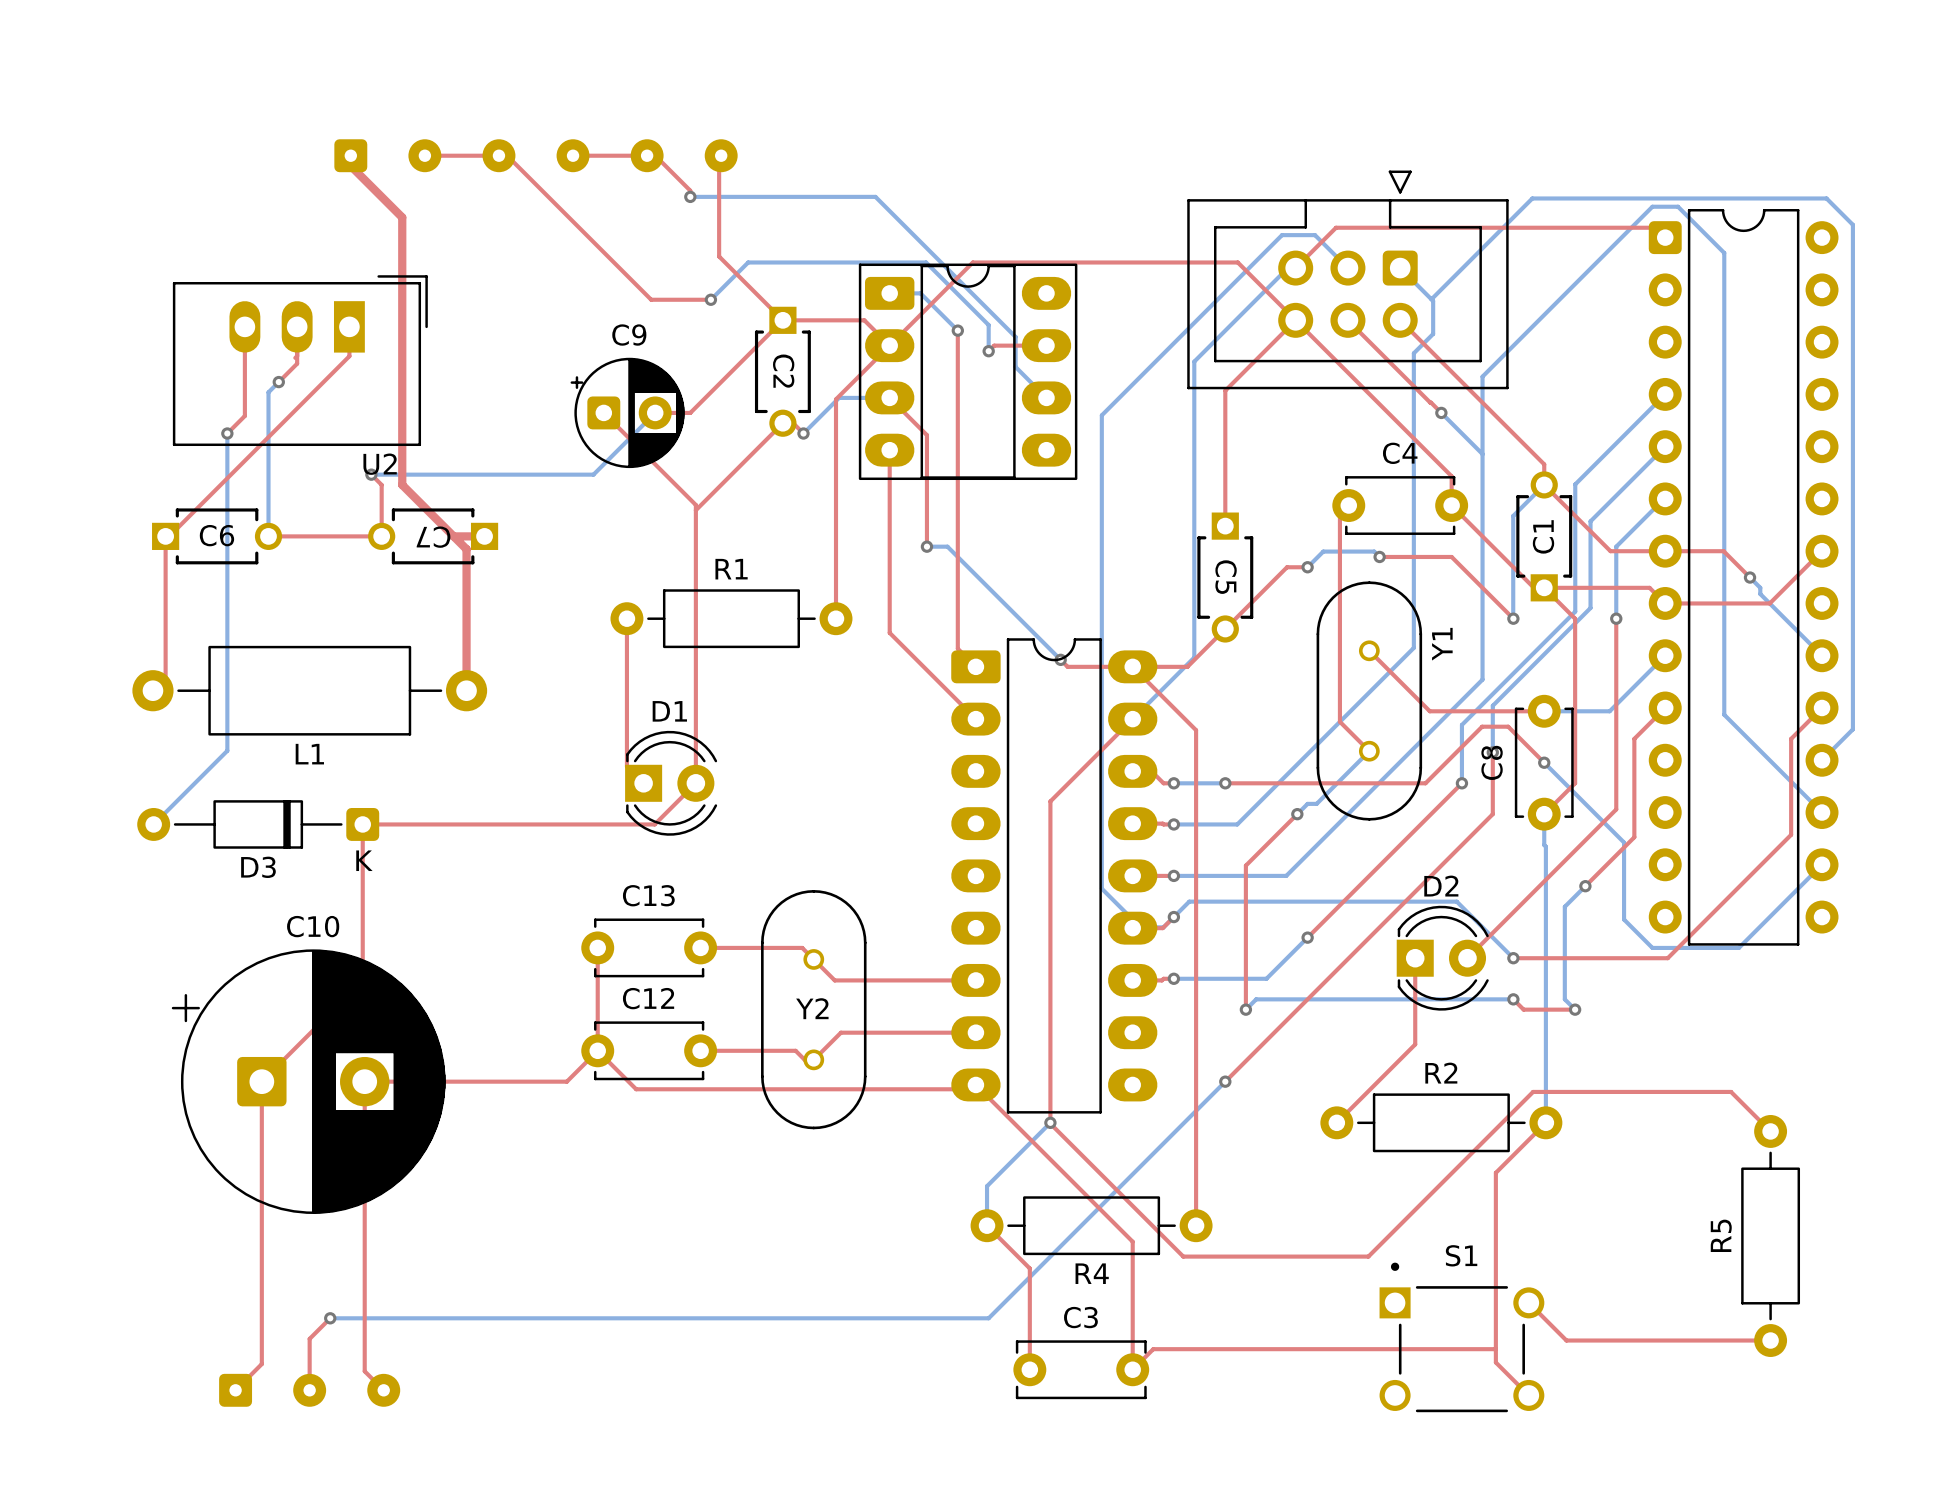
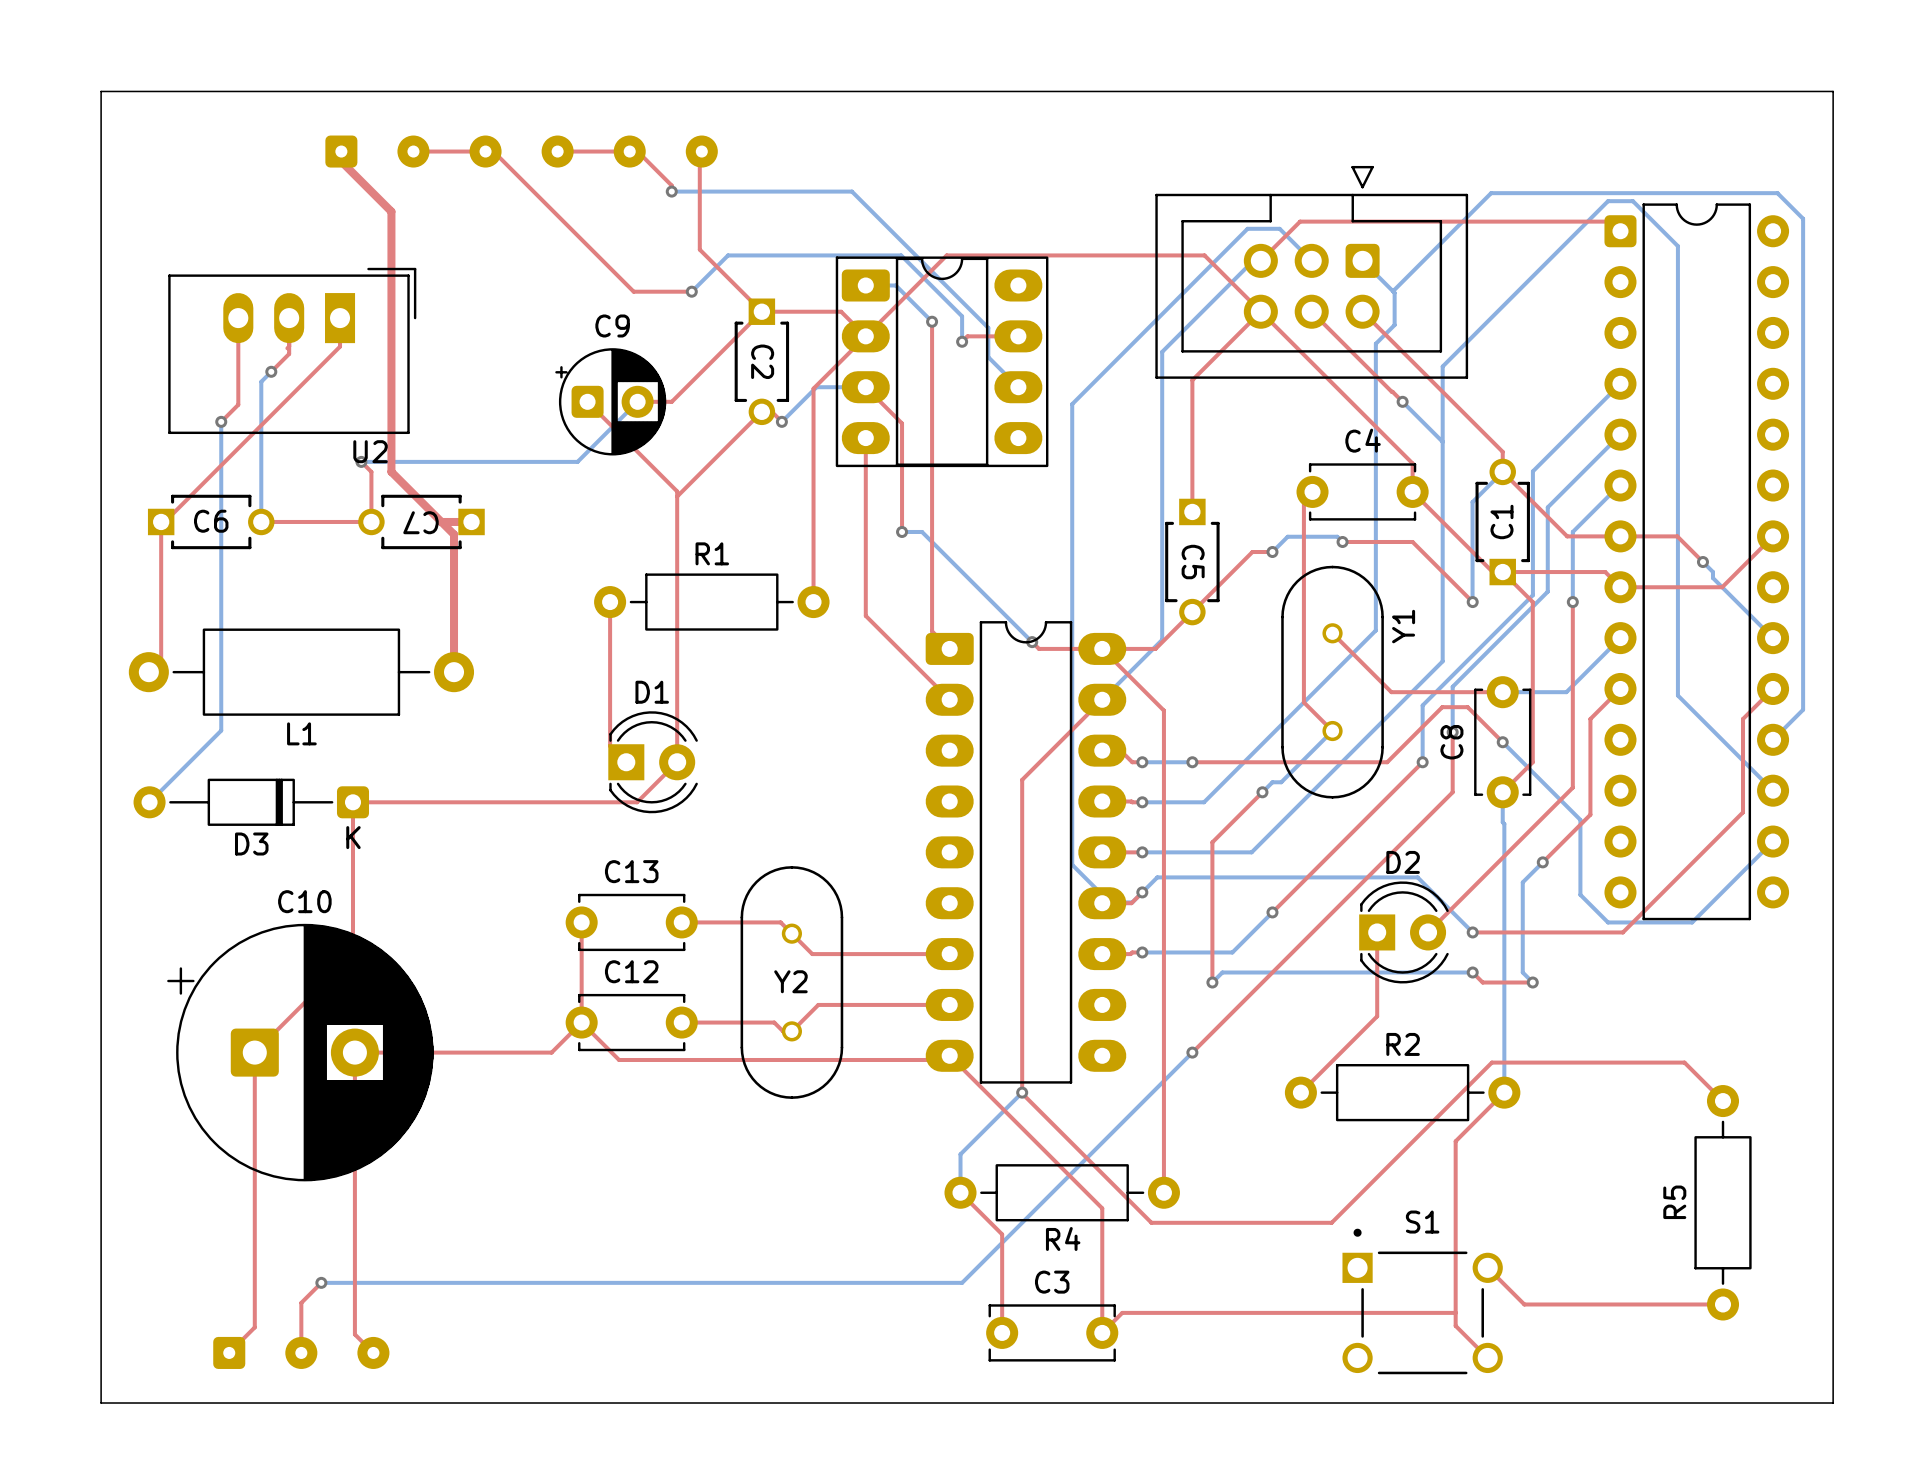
board edge: none -> (101, 91) (1833, 91) (1833, 1403) (101, 1403) (101, 91)

